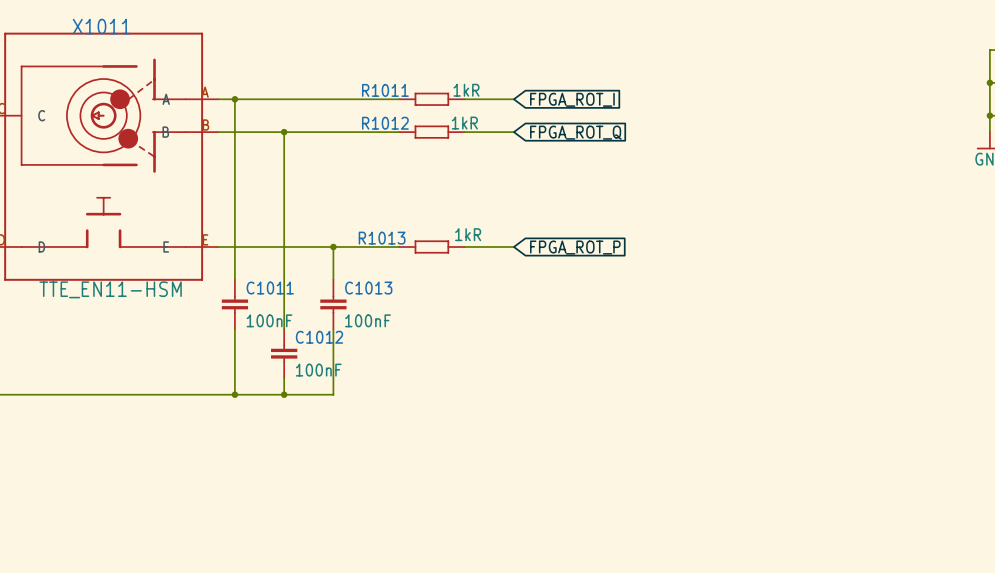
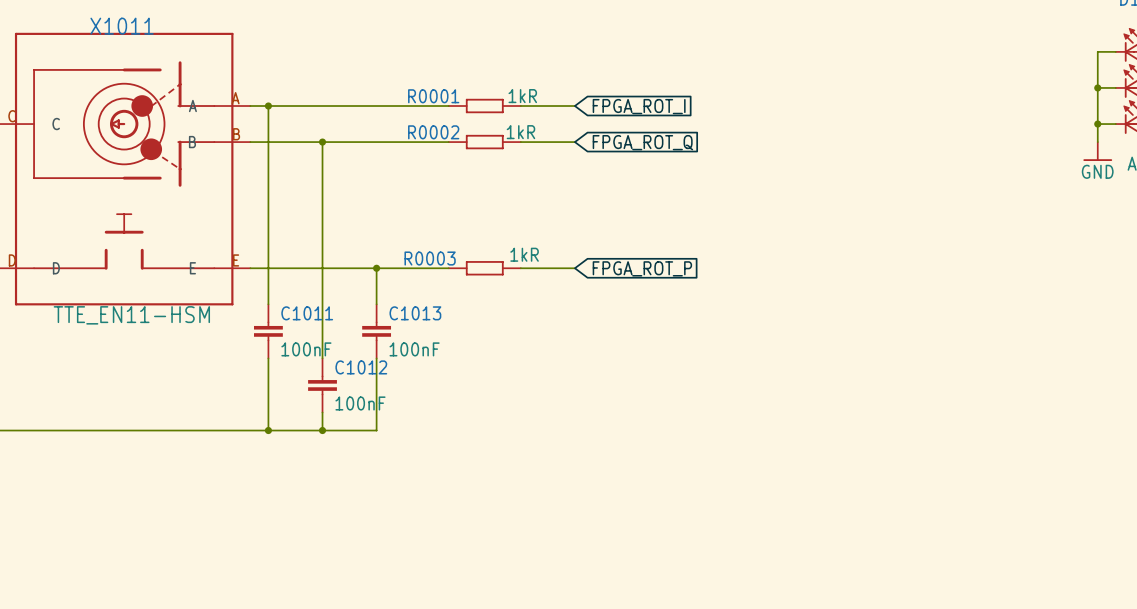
R1011 name: R1011 (385, 90) -> R0001 (433, 96)
R1012 name: R1012 (385, 123) -> R0002 (433, 132)
R1013 name: R1013 (382, 238) -> R0003 (430, 258)

